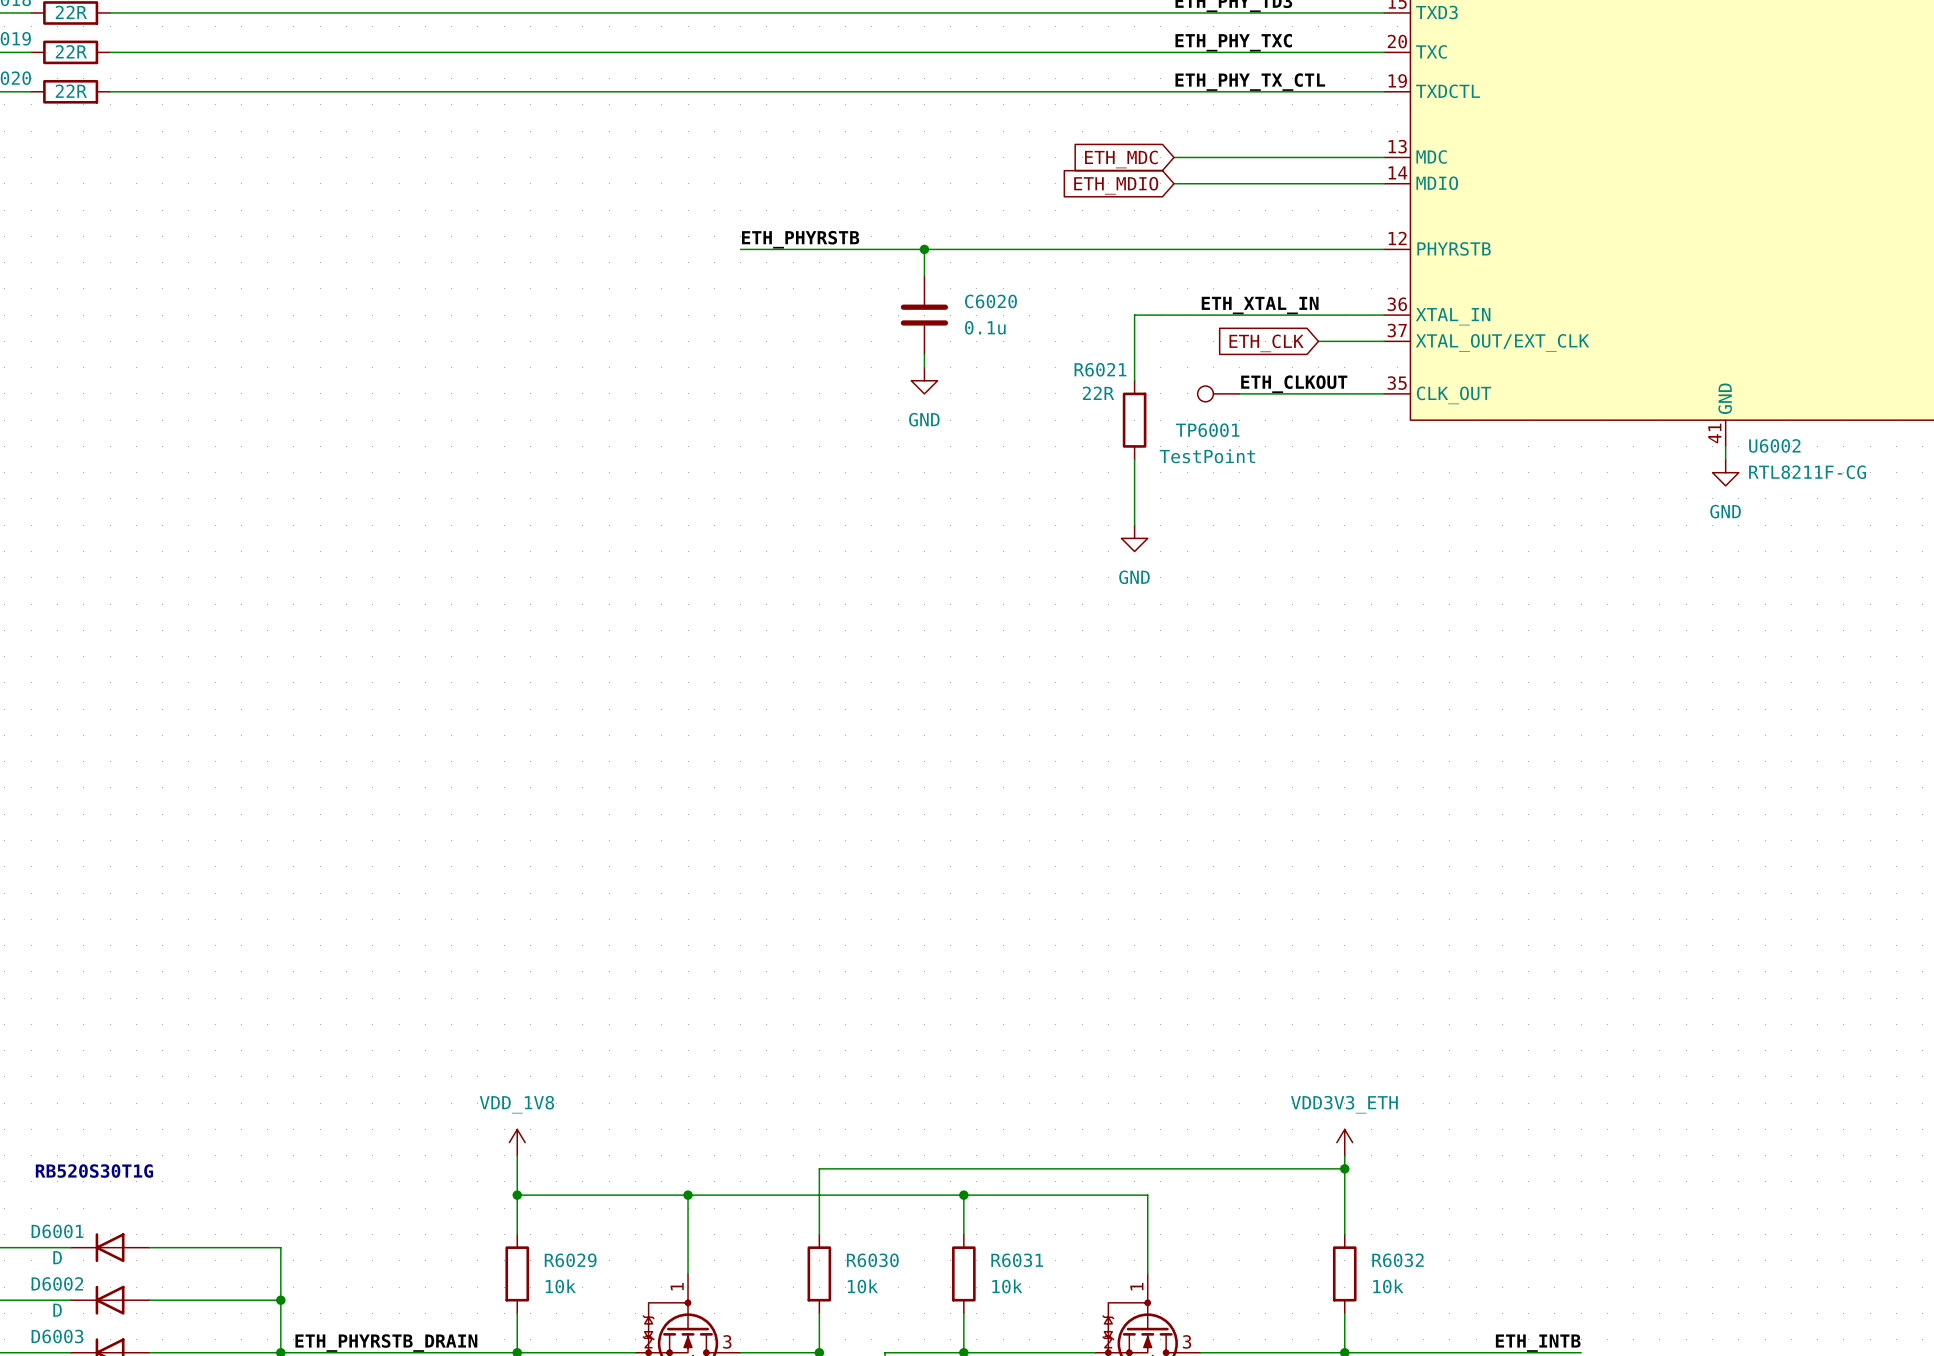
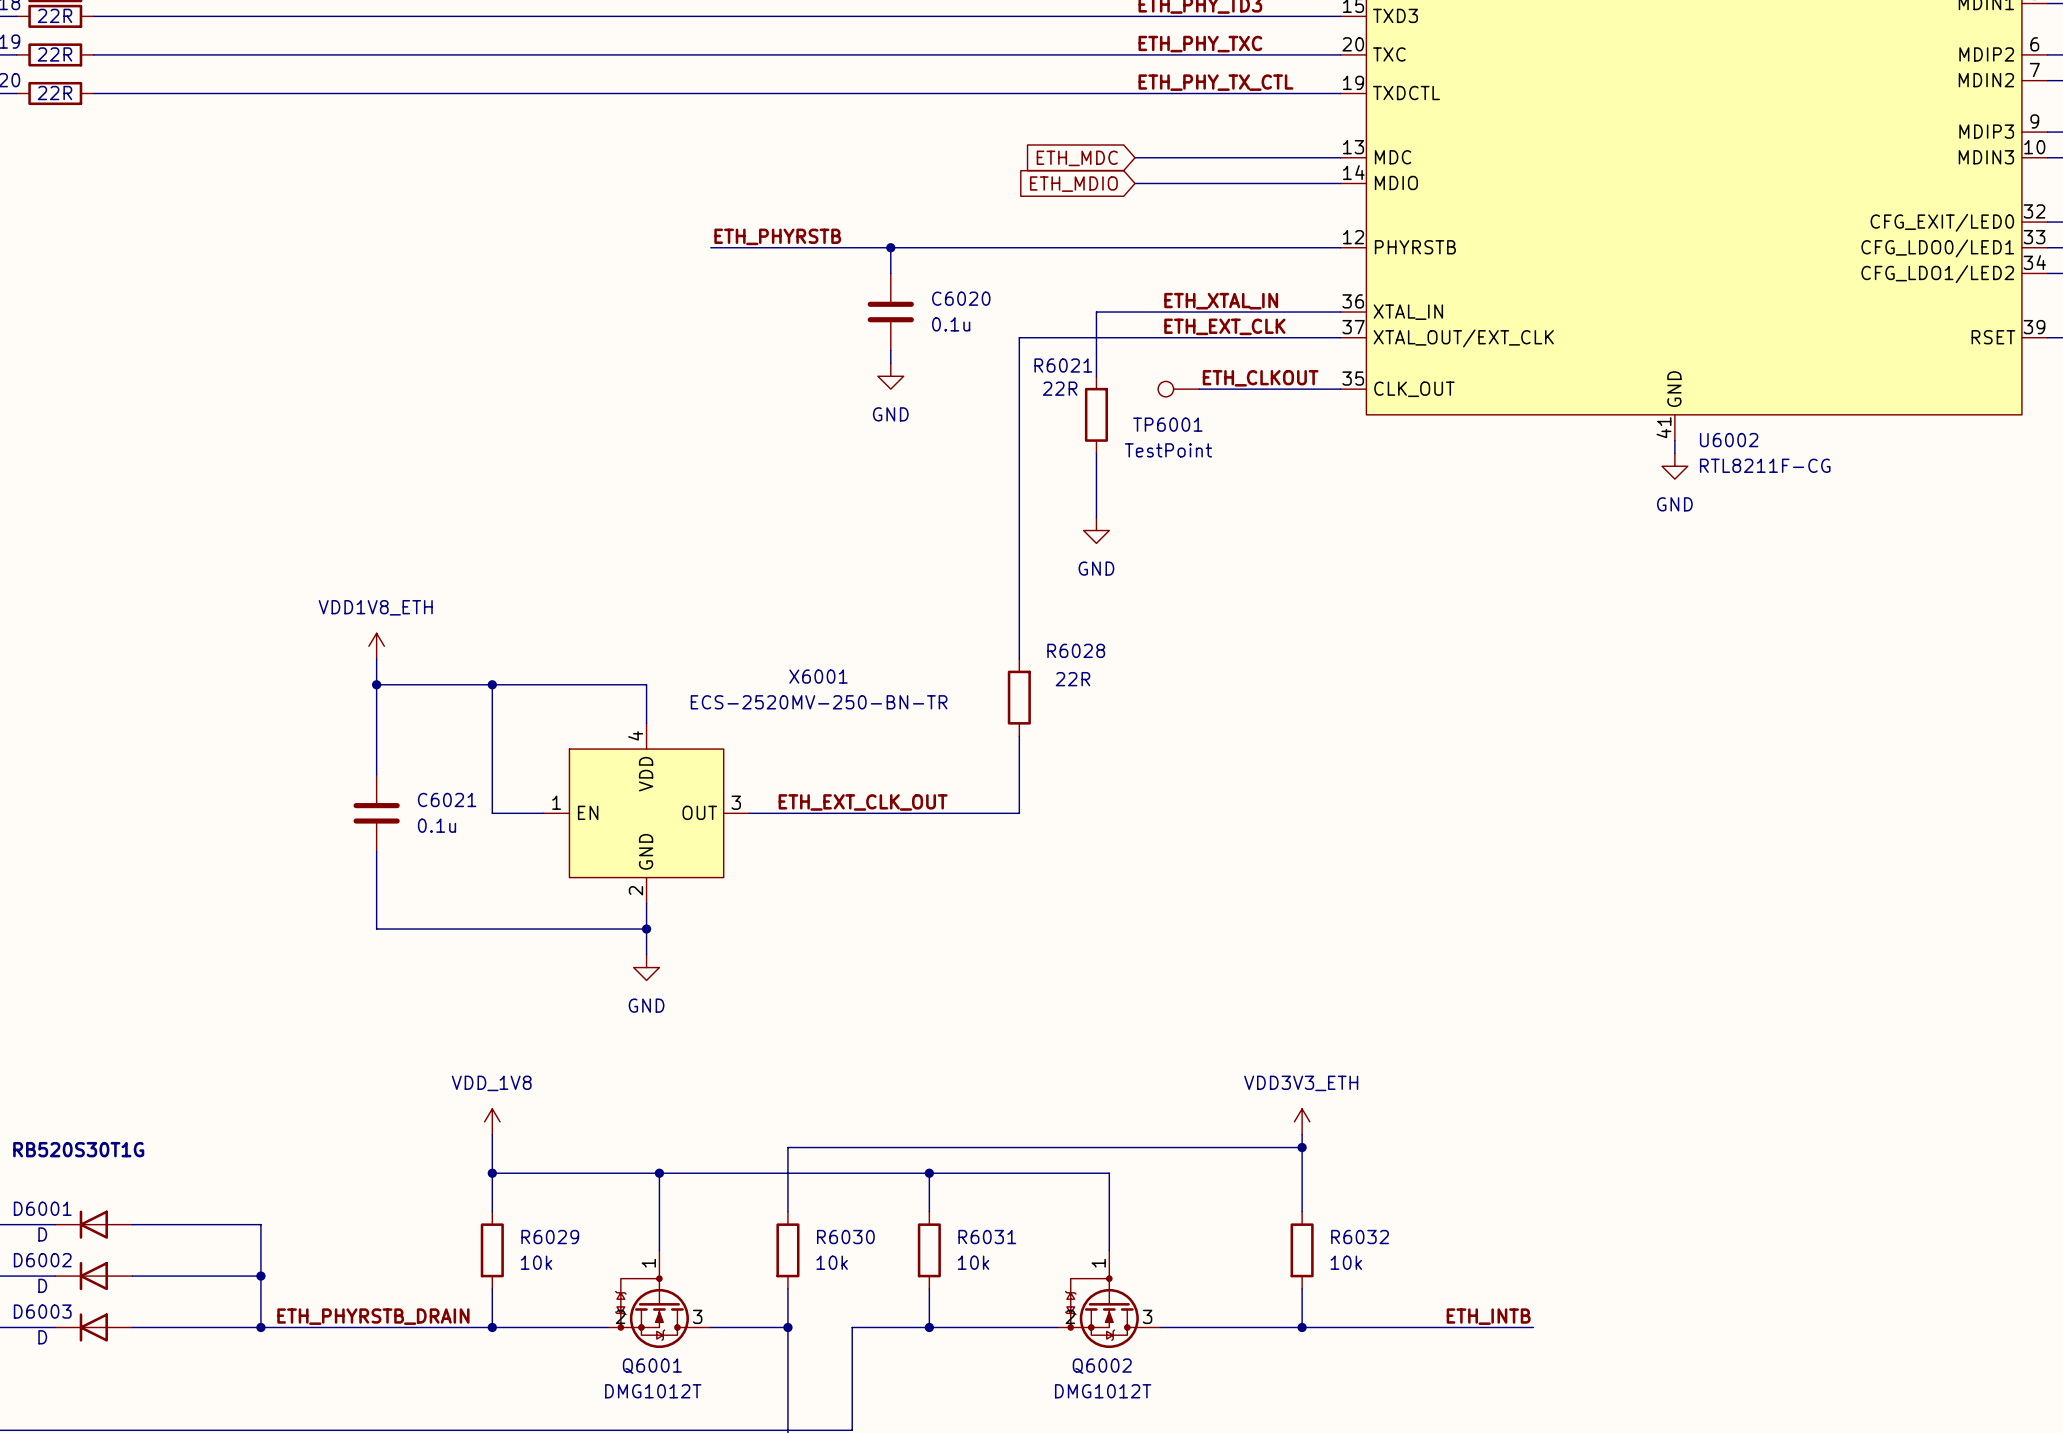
label: none -> ETH_EXT_CLK (1224, 326)
wire: none -> (1276, 337) (1019, 337) (1019, 659)
global label: ETH_CLK (1266, 343) -> none
power symbol: none -> VDD1V8_ETH (376, 646)
wire: none -> (376, 659) (376, 774)
wire: none -> (376, 684) (646, 684) (646, 723)
junction: none -> (376, 684)
wire: none -> (492, 684) (492, 813) (543, 813)
junction: none -> (492, 684)
R6028: none -> 22R (1019, 697)
wire: none -> (1019, 736) (1019, 813) (749, 813)
label: none -> ETH_EXT_CLK_OUT (863, 802)
C6021: none -> 0.1u (376, 813)
X6001: none -> ECS-2520MV-250-BN-TR (646, 813)
wire: none -> (376, 851) (376, 929) (646, 929)
wire: none -> (646, 903) (646, 954)
junction: none -> (646, 929)
power symbol: none -> GND (646, 967)

